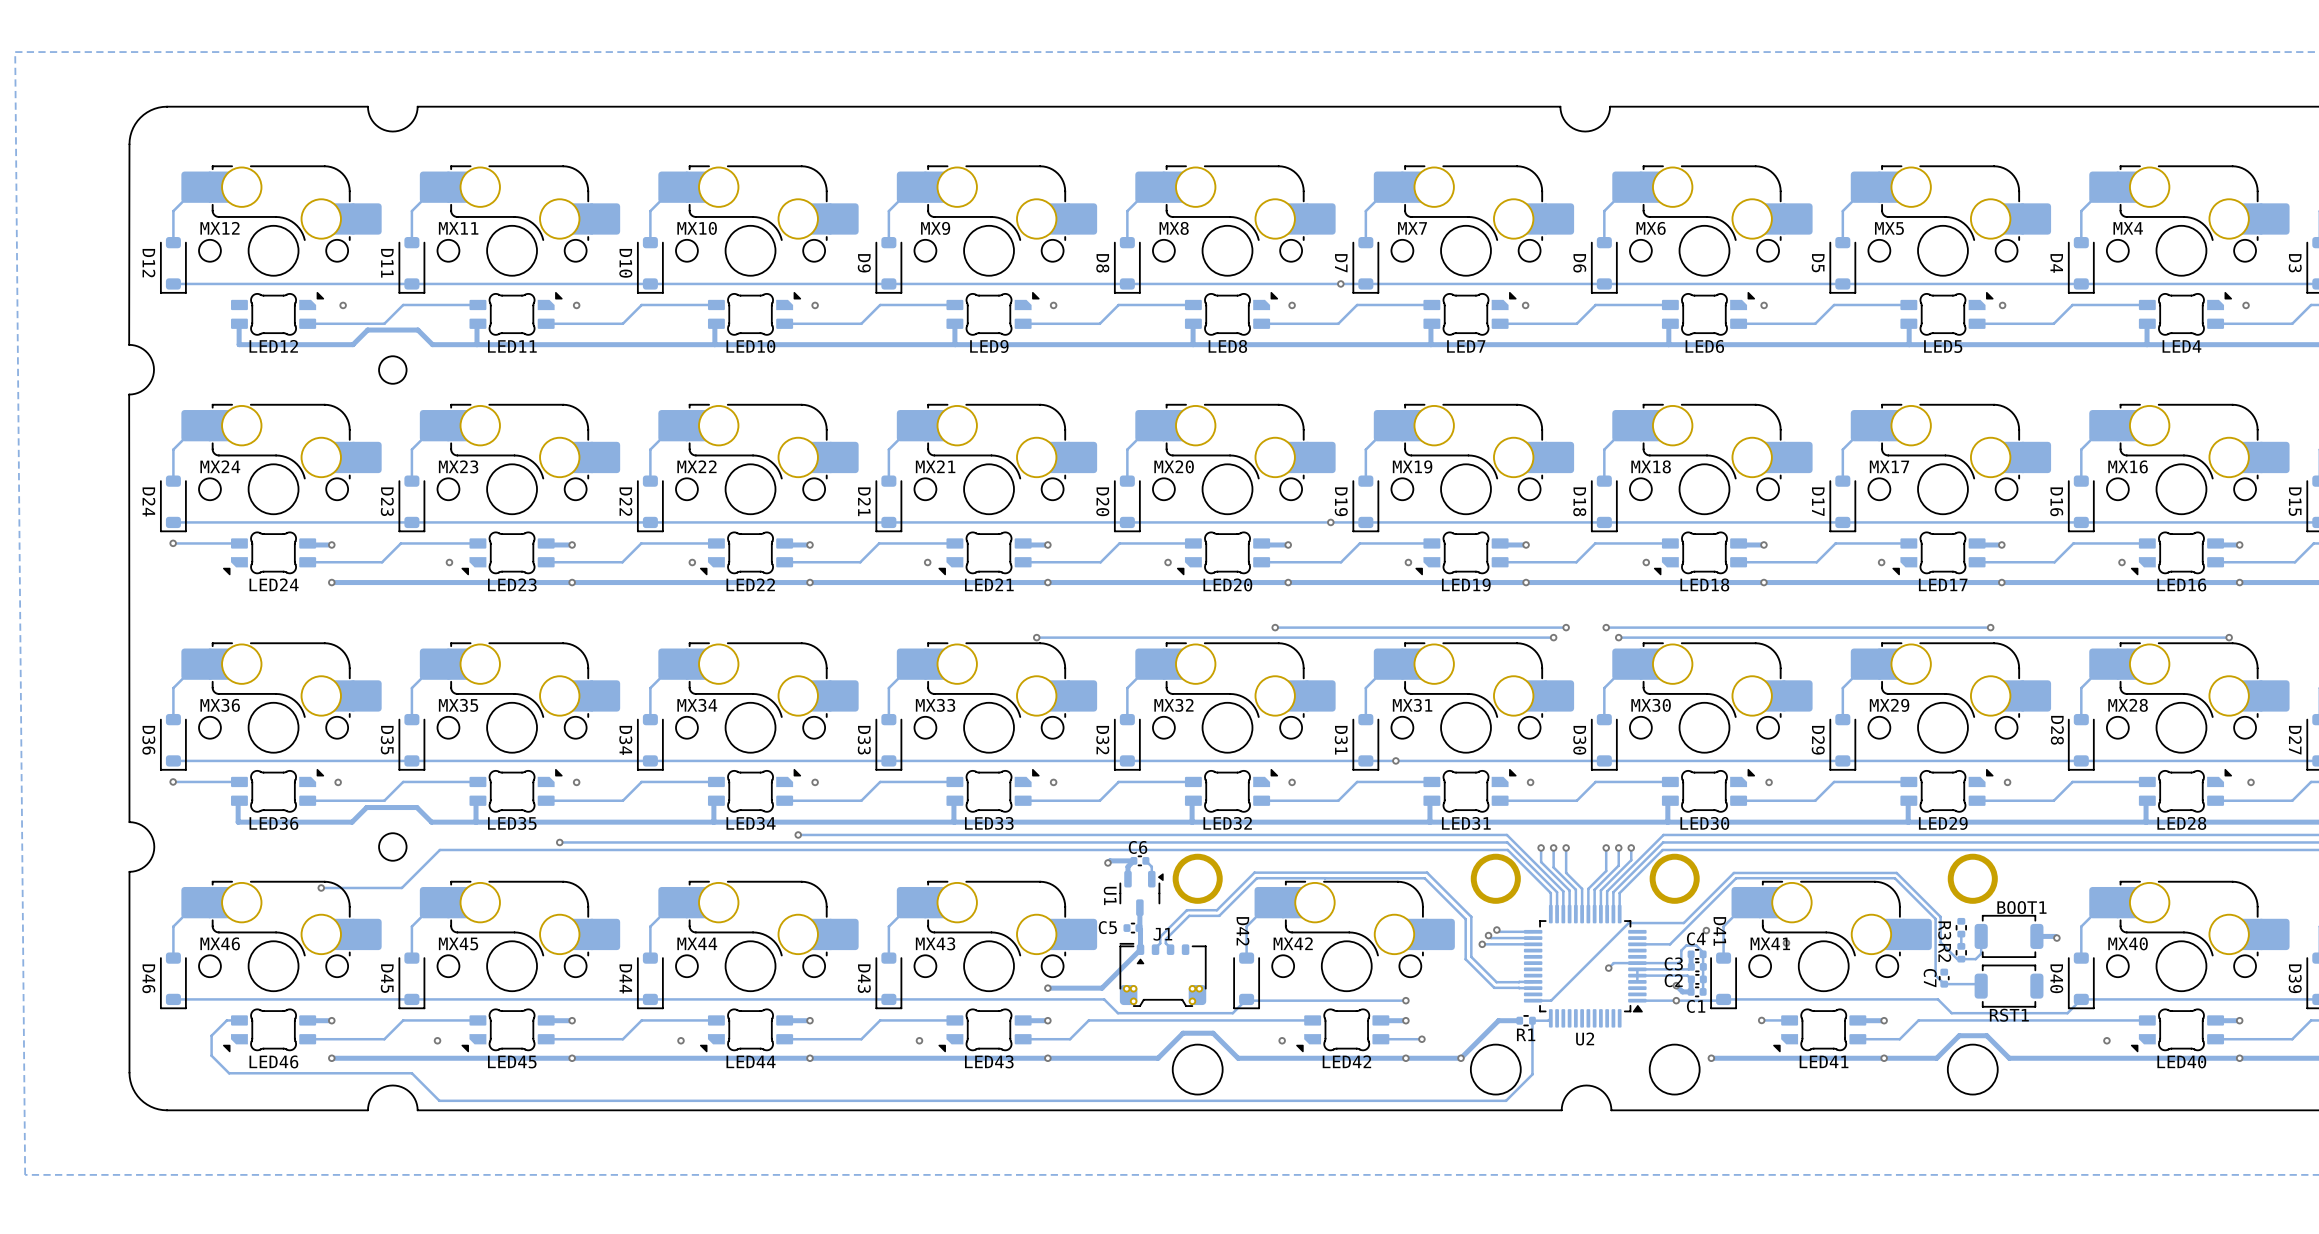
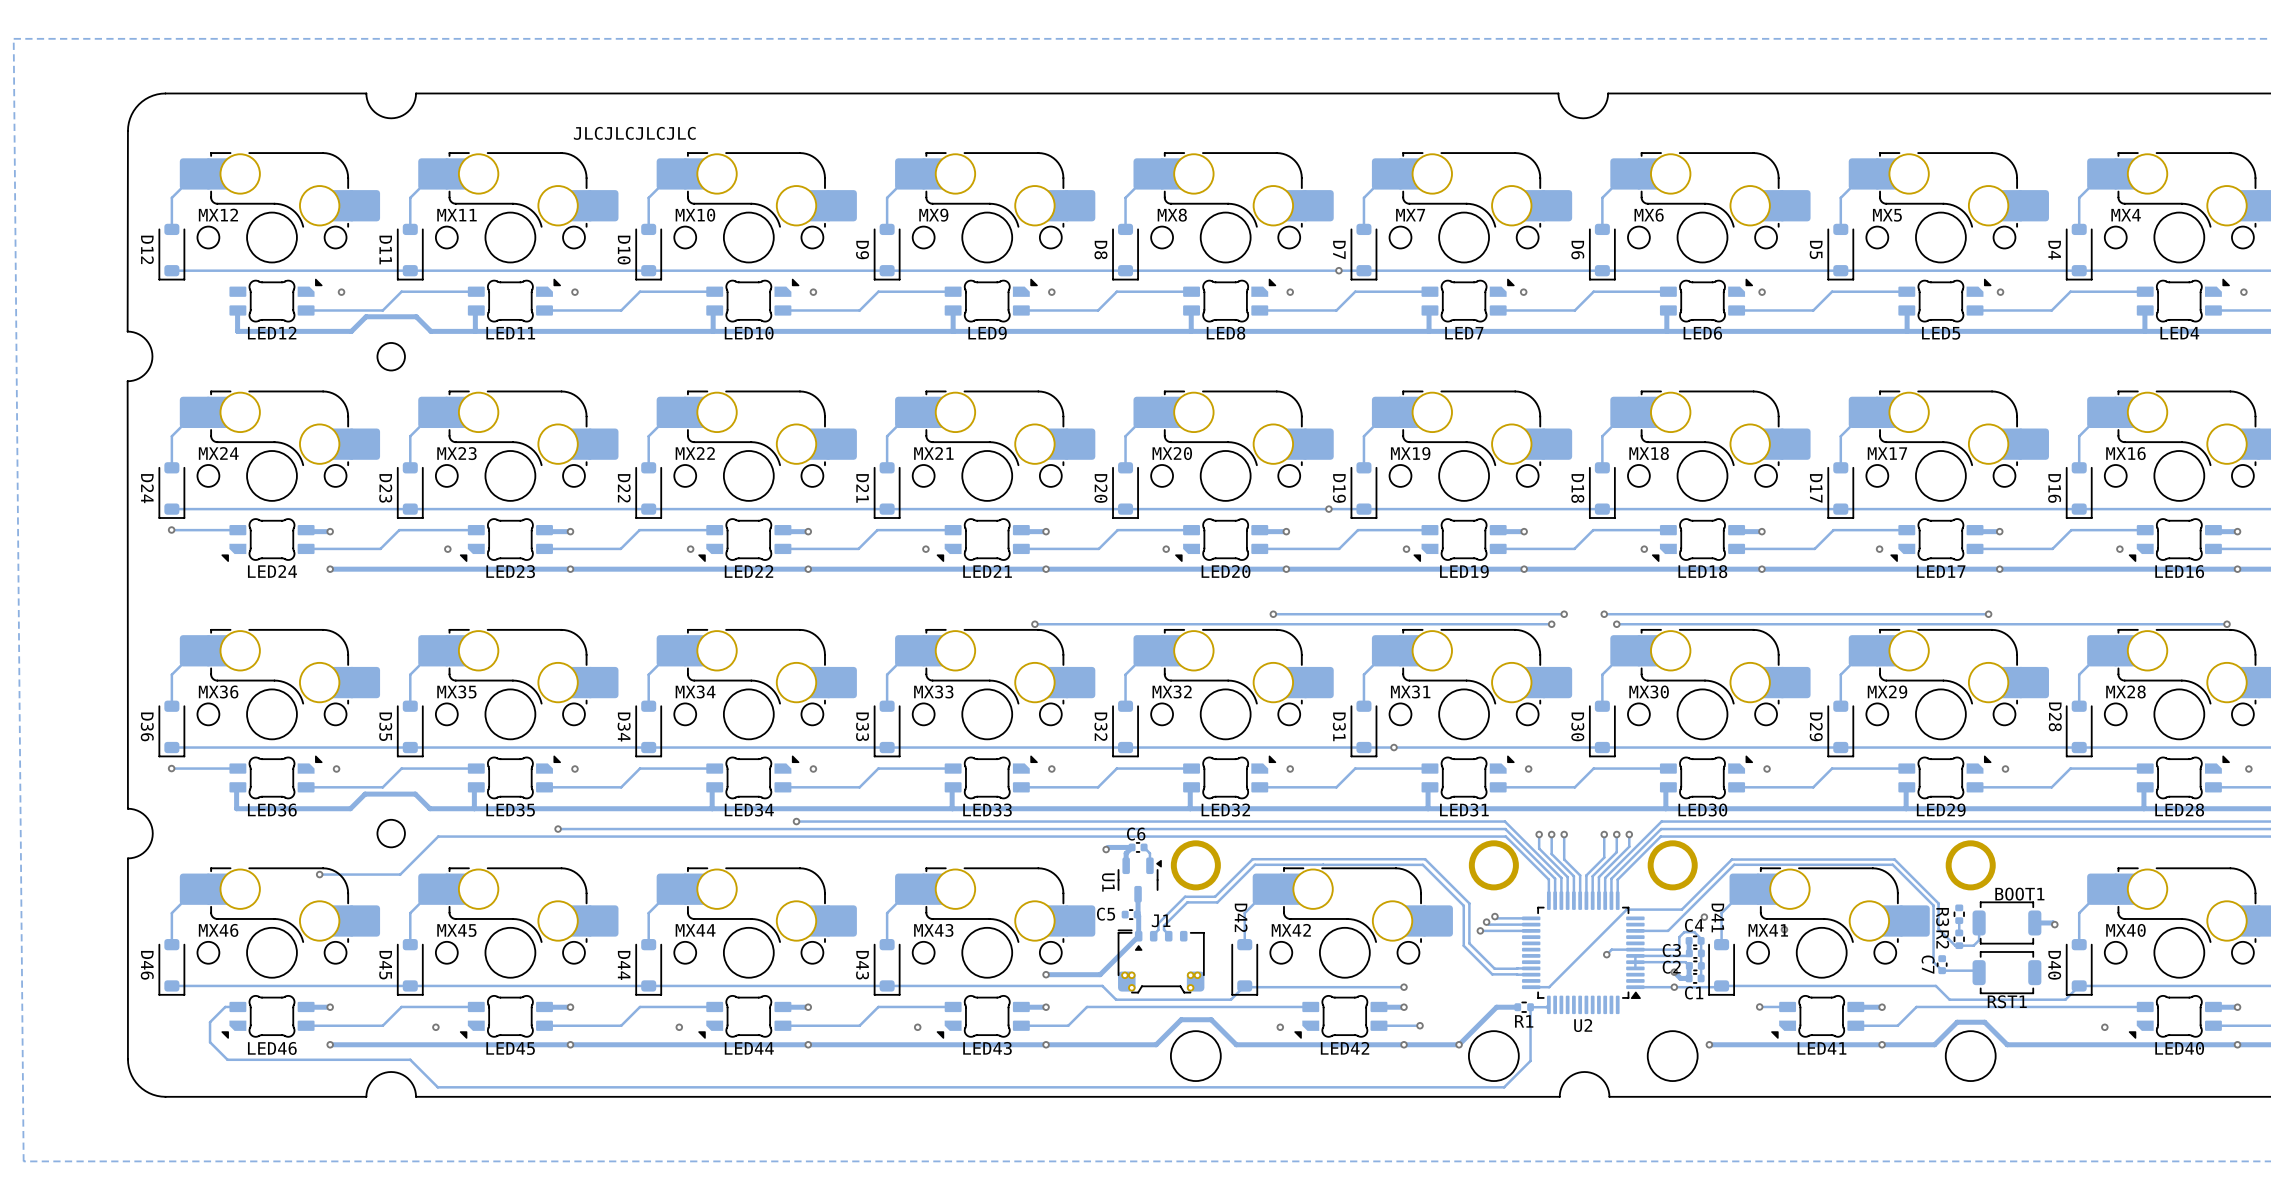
text: none -> JLCJLCJLCJLC (634, 133)

